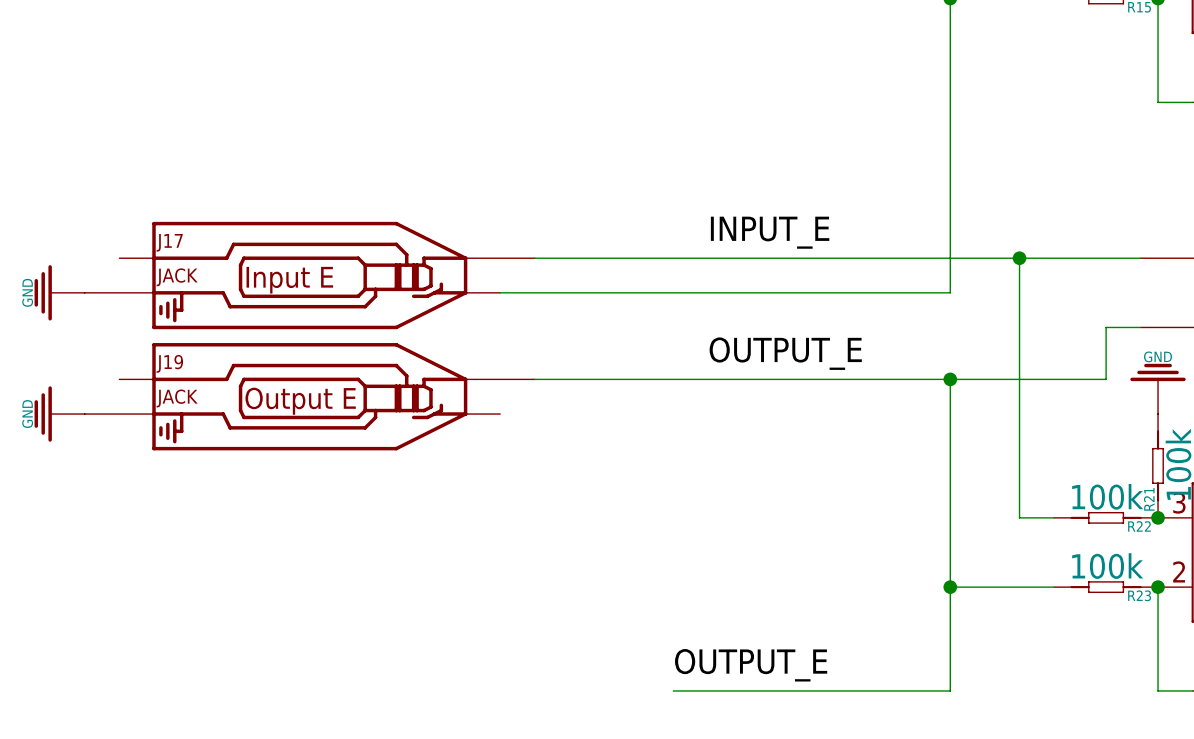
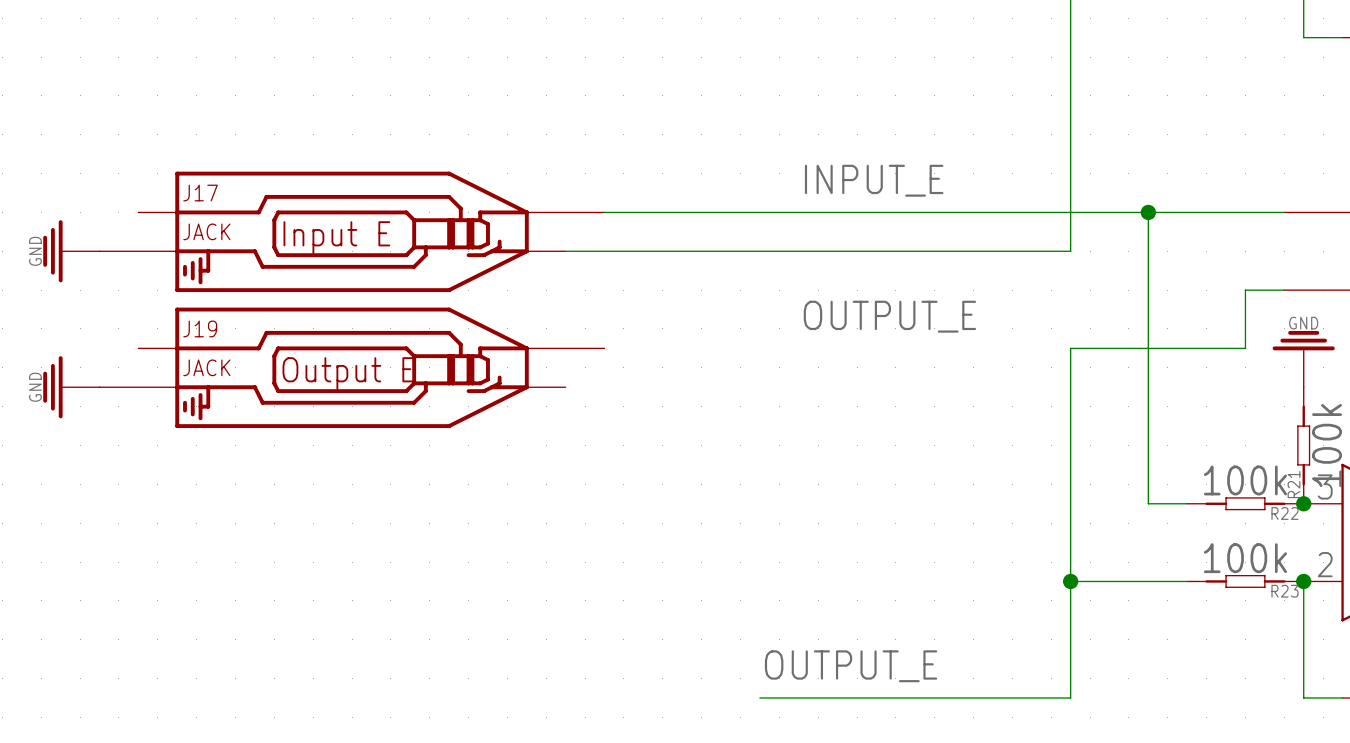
wire: (534, 379) (950, 379) -> none
junction: (950, 379) -> none

